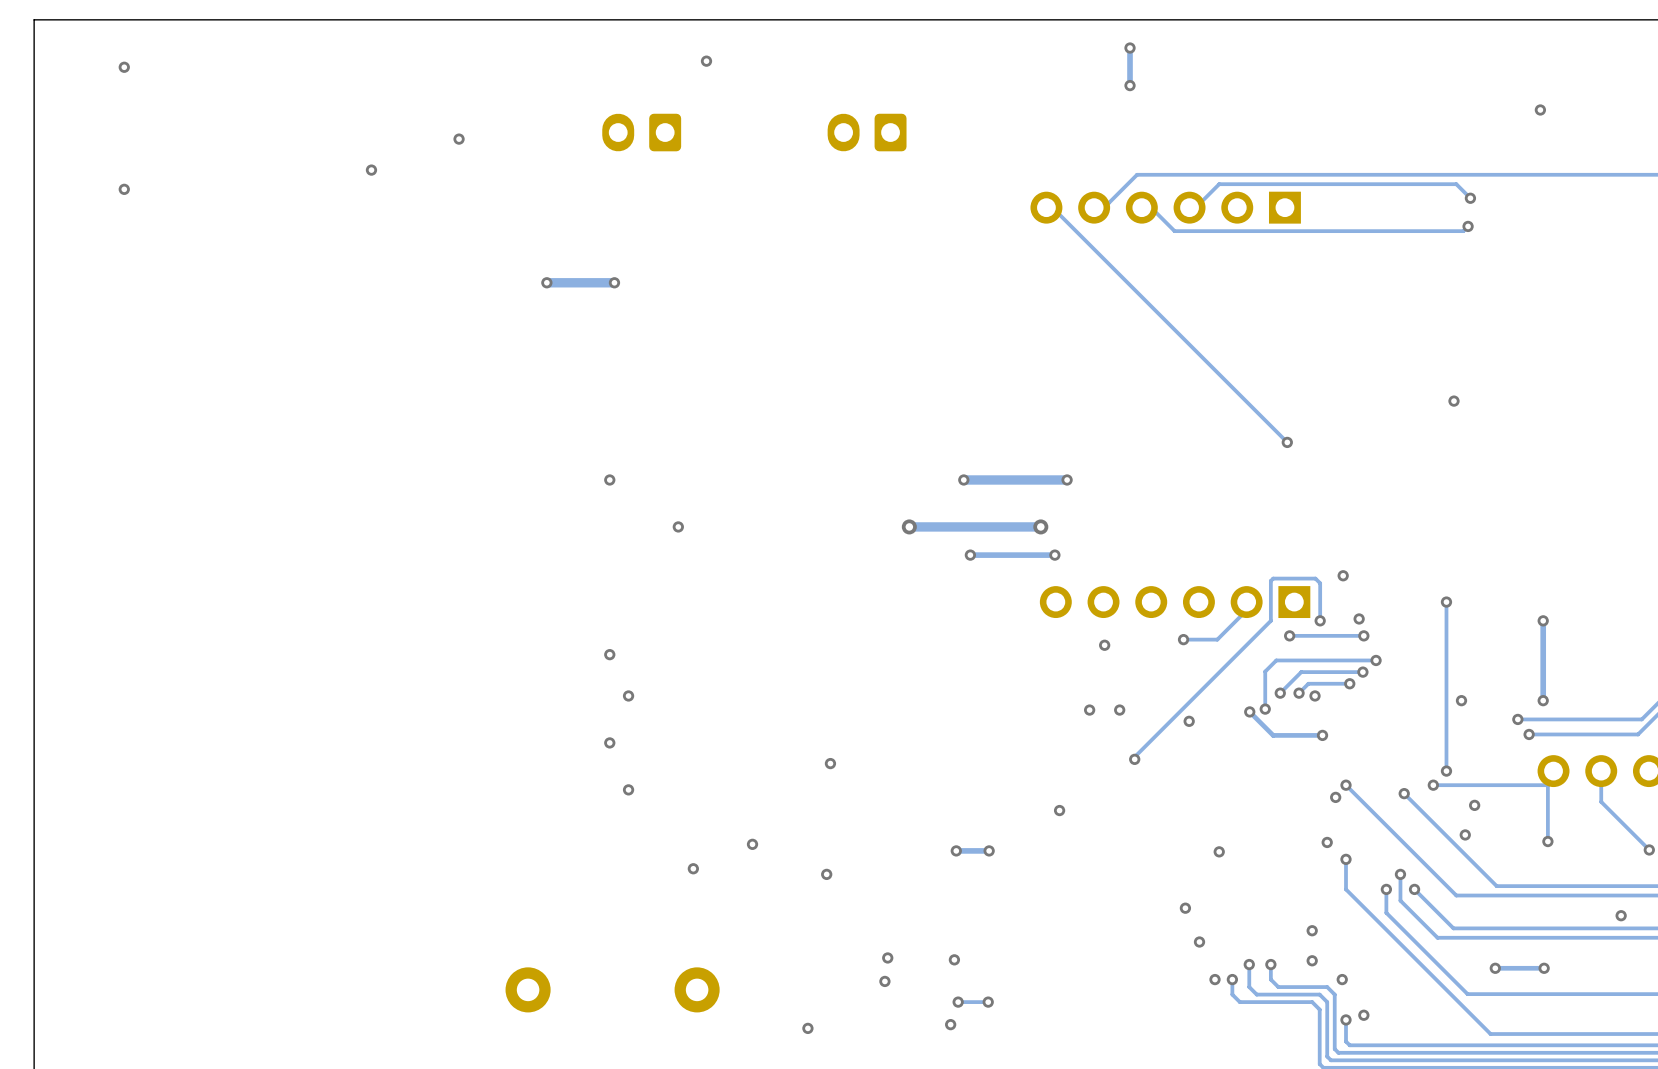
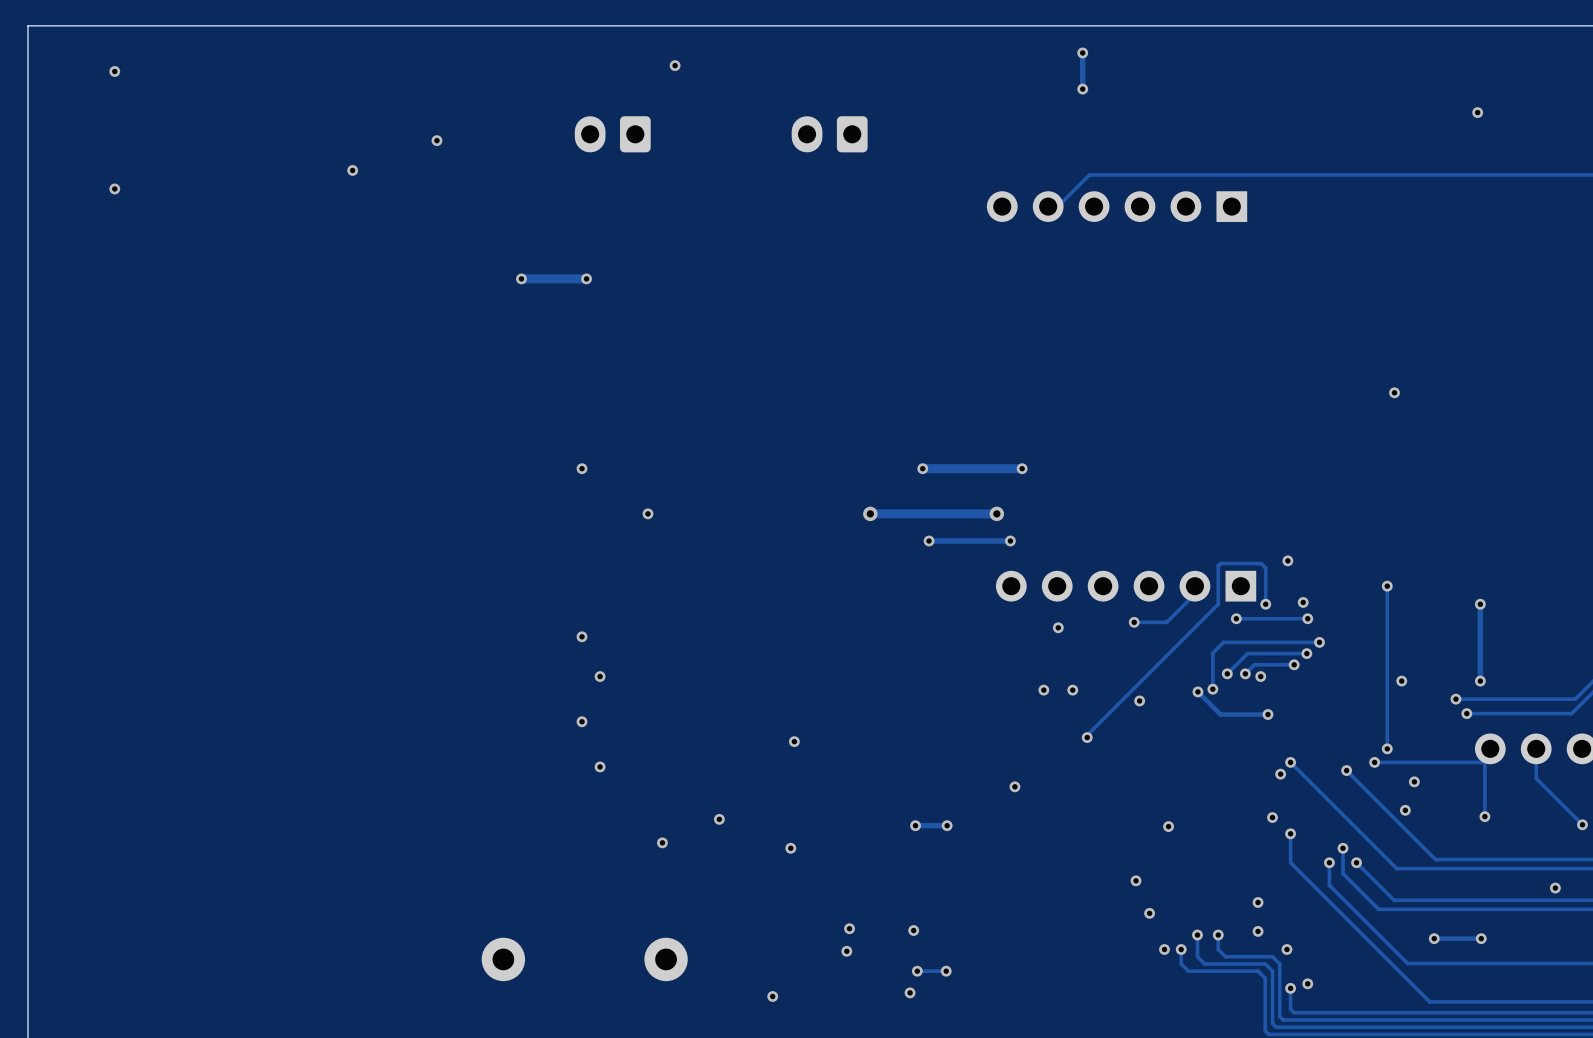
track: (1470, 198) (1456, 184) (1219, 184) (1202, 200) -> none
via: (1470, 198) -> none
track: (1155, 212) (1174, 231) (1463, 231) (1468, 226) -> none
track: (1059, 214) (1287, 442) -> none
via: (1468, 226) -> none
via: (1287, 442) -> none

